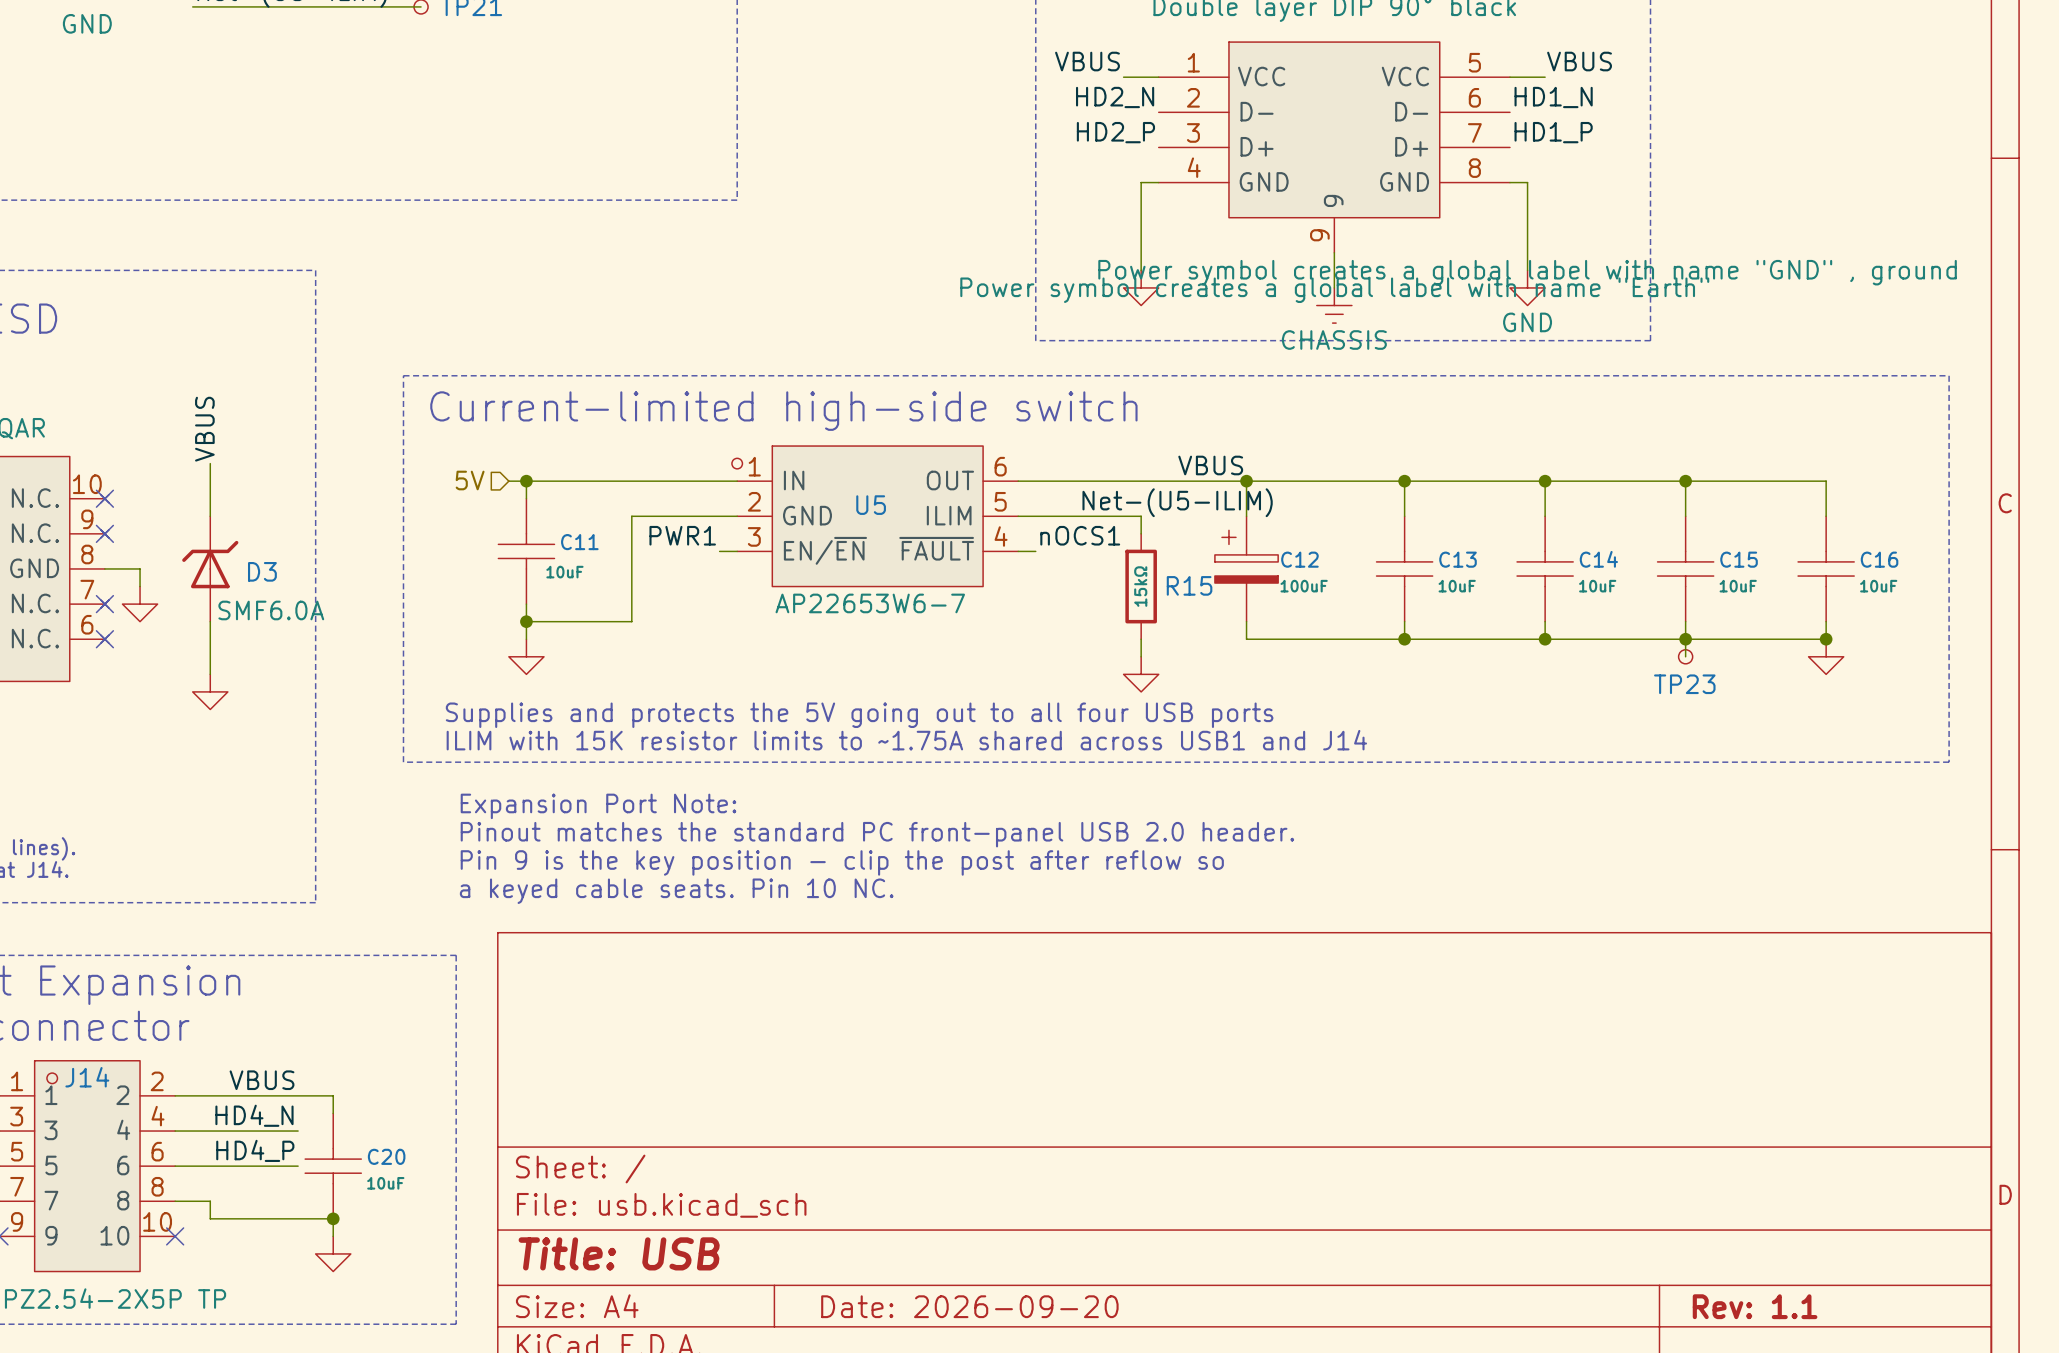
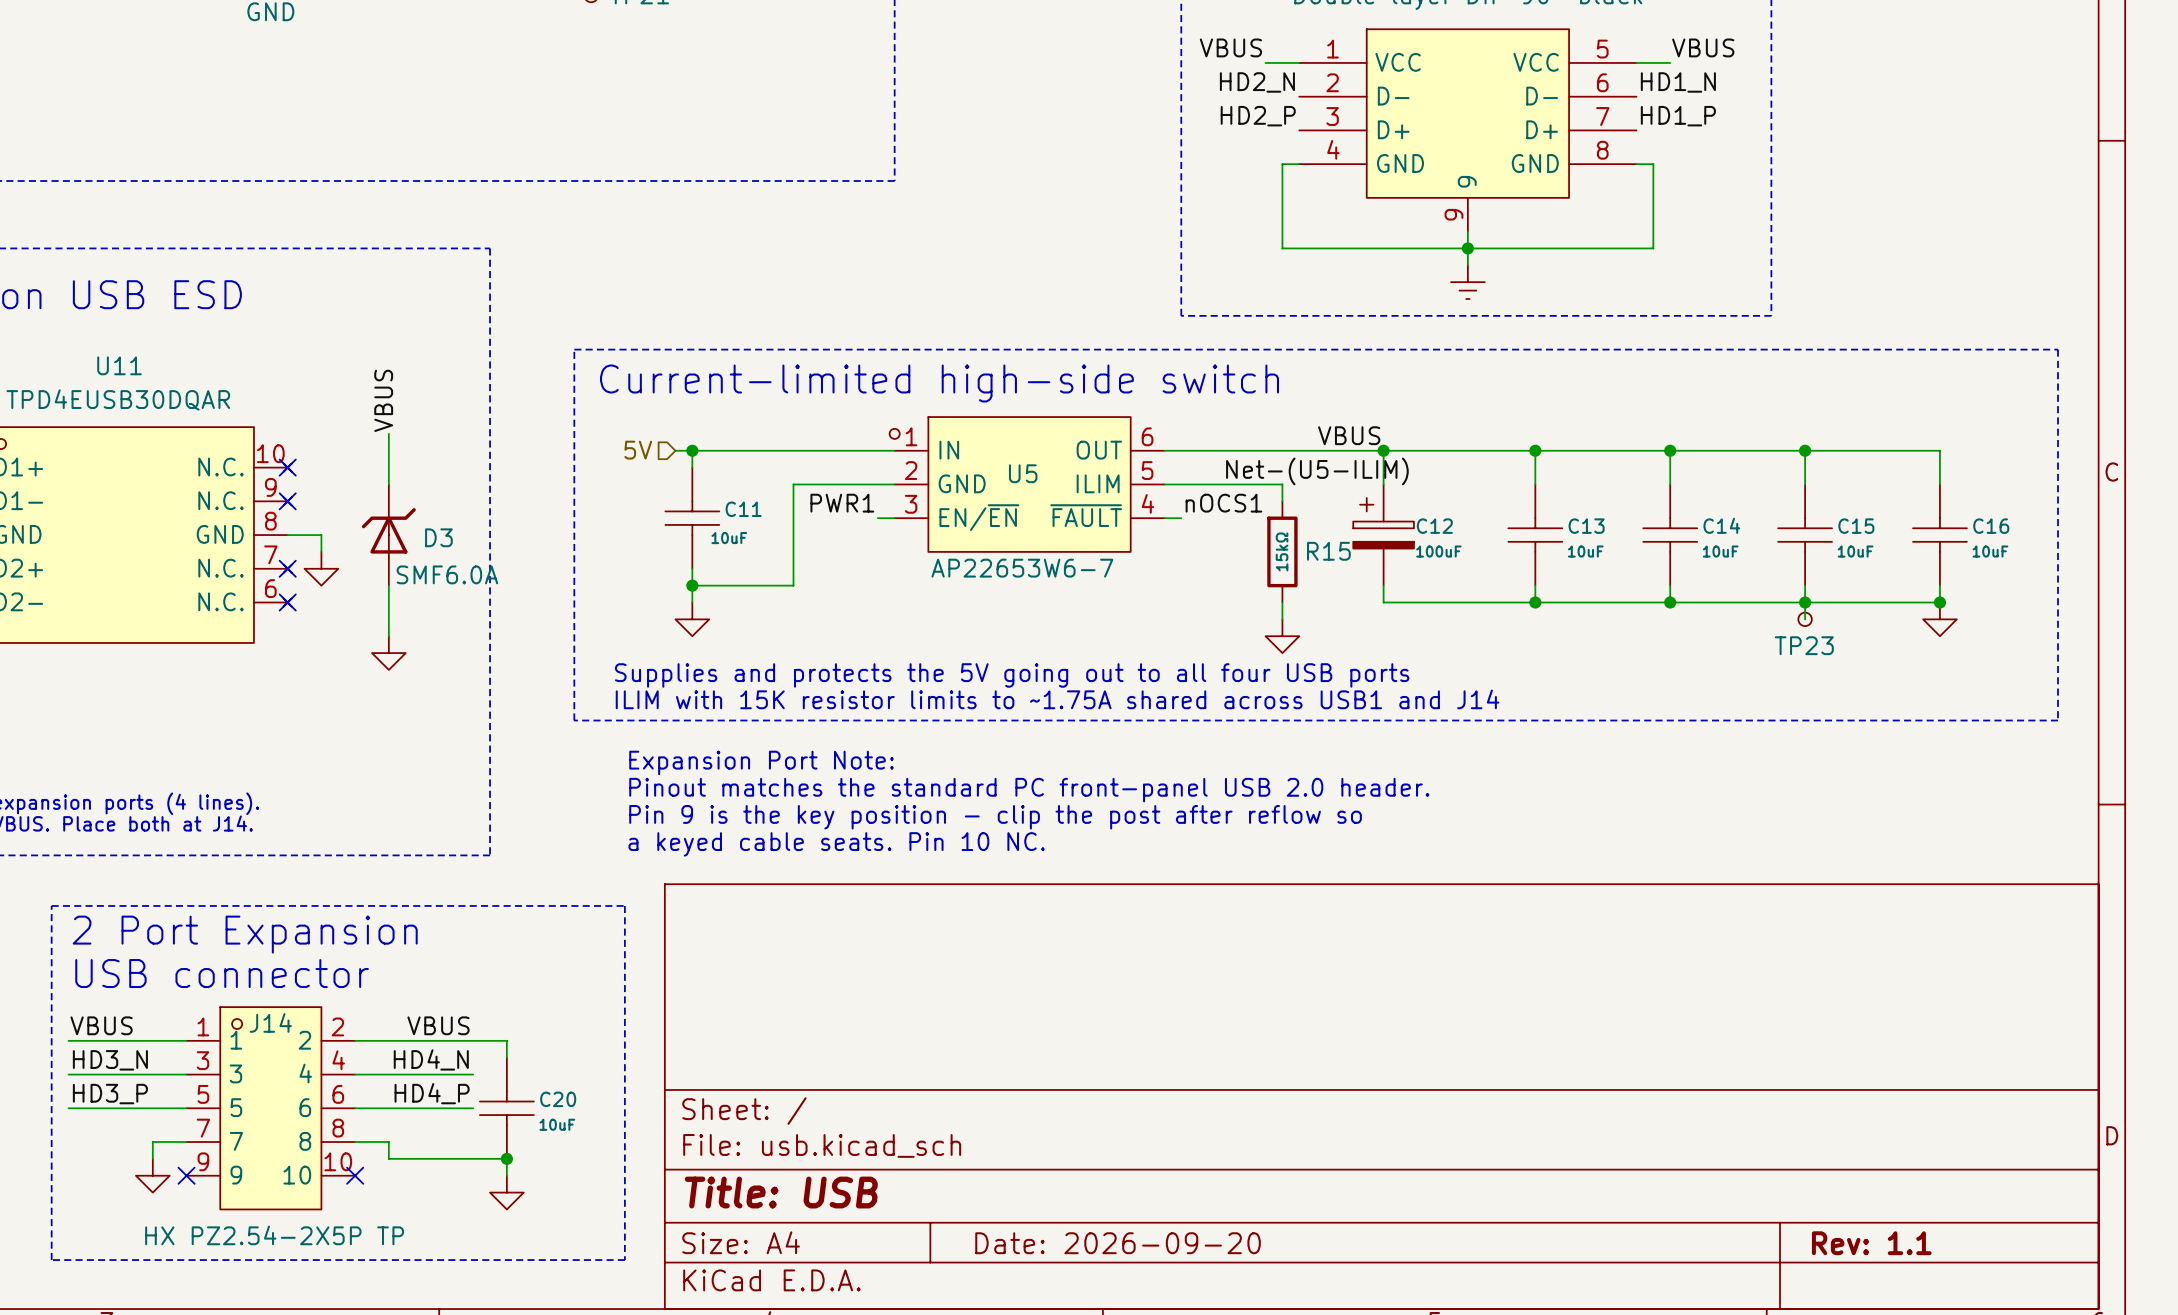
wire: none -> (1282, 248) (1653, 248)
junction: none -> (1467, 248)
power symbol: (1141, 287) -> none
power symbol: GND (1527, 287) -> none
power symbol text: Power symbol creates a global label with name "Earth" (1334, 290) -> none
power symbol text: CHASSIS (1334, 339) -> none

